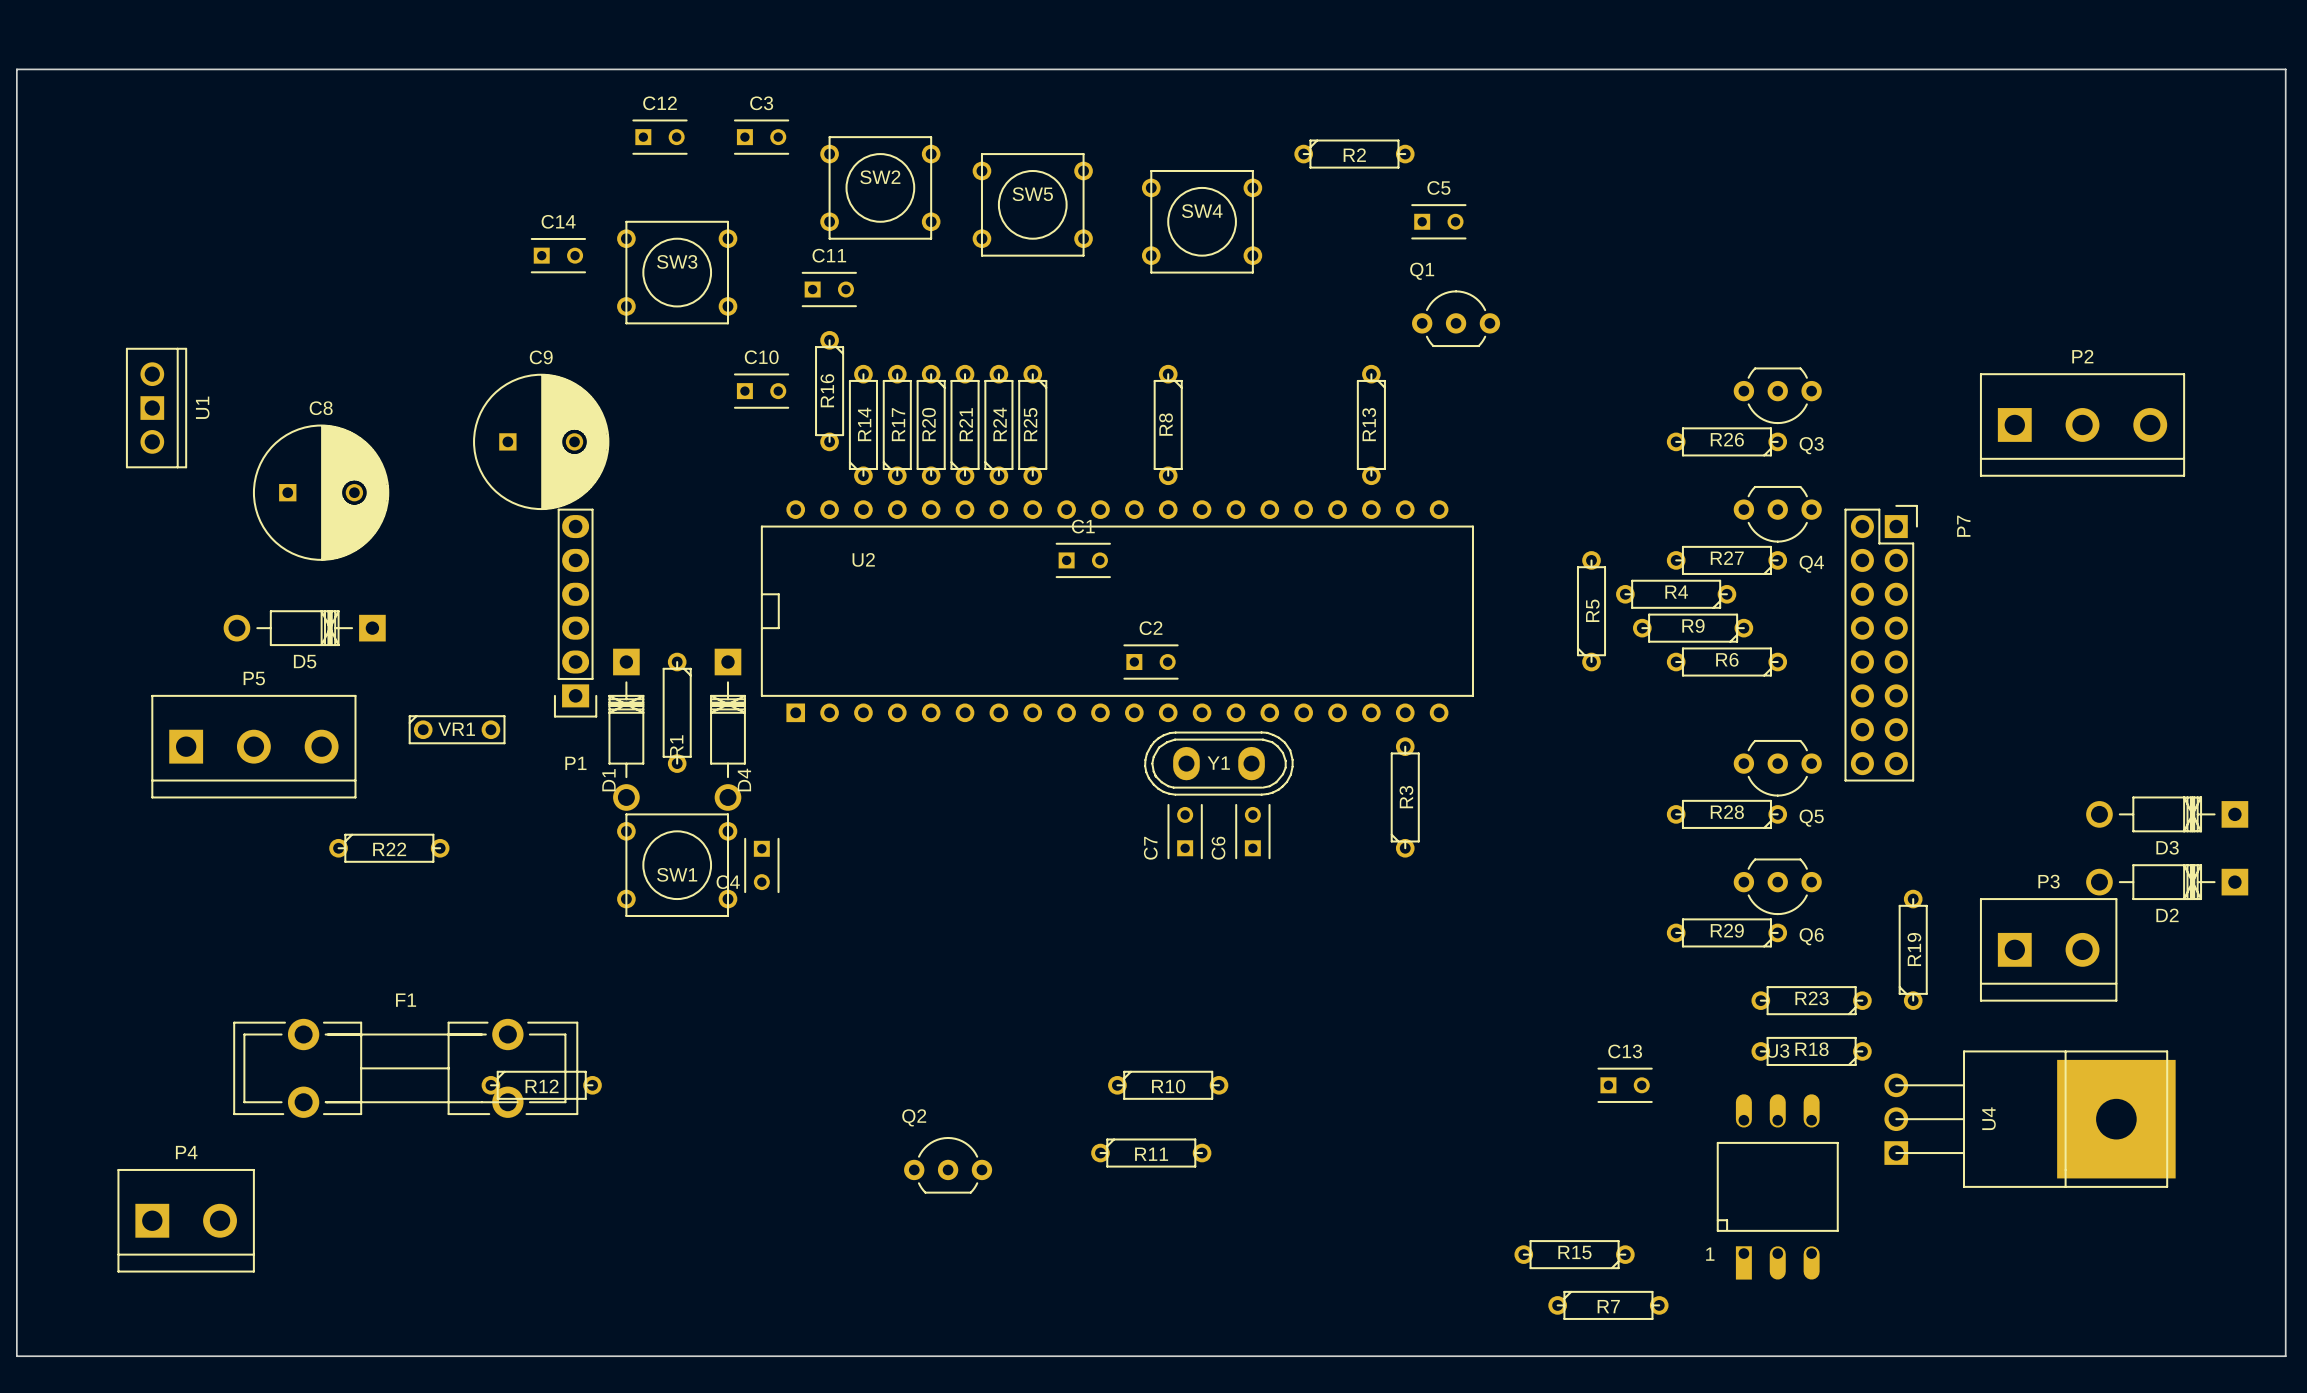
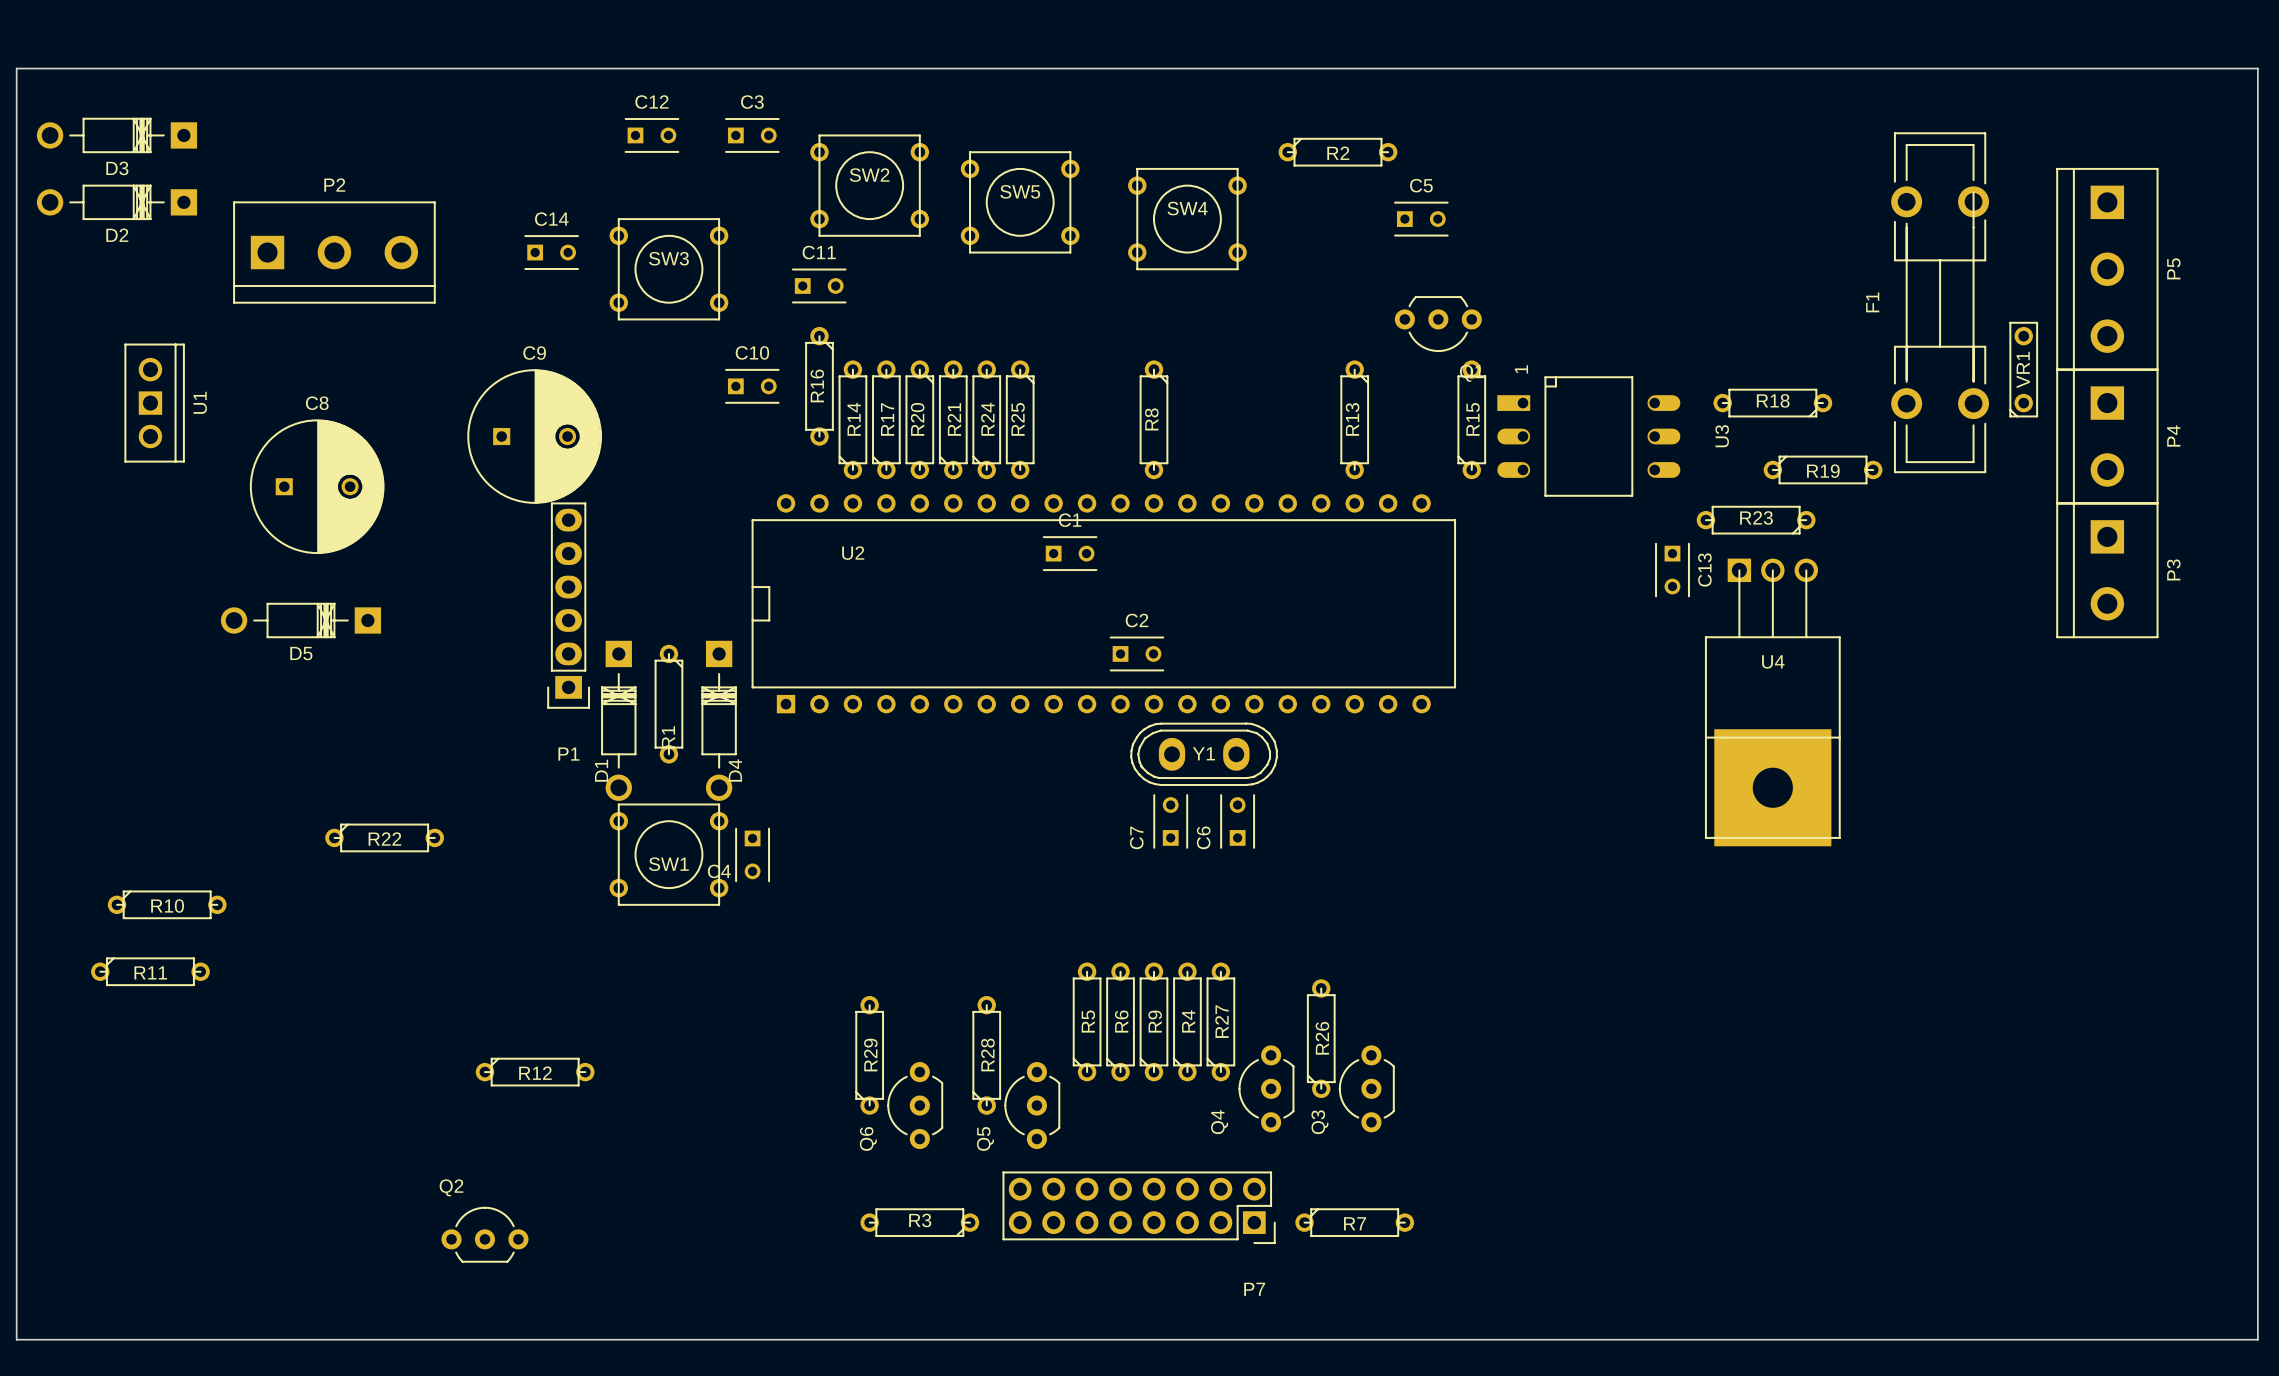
Q1 rotation: 0° (1456, 318) -> 180° (1438, 324)
Q3 rotation: 0° (1777, 395) -> 90° clockwise (1366, 1088)
Q3 position: (1777, 395) -> (1366, 1088)
P2 position: (2082, 424) -> (334, 252)
R26 rotation: 0° (1726, 441) -> 90° clockwise (1321, 1038)
R26 position: (1726, 441) -> (1321, 1038)
Q4 rotation: 0° (1777, 514) -> 90° clockwise (1266, 1088)
Q4 position: (1777, 514) -> (1266, 1088)
R27 rotation: 0° (1726, 560) -> 90° clockwise (1220, 1021)
R27 position: (1726, 560) -> (1220, 1021)
R4 rotation: 0° (1676, 594) -> 90° clockwise (1187, 1021)
R4 position: (1676, 594) -> (1187, 1021)
R5 position: (1591, 611) -> (1087, 1021)
R9 rotation: 0° (1693, 628) -> 90° clockwise (1153, 1021)
R9 position: (1693, 628) -> (1153, 1021)
P7 rotation: 0° (1881, 643) -> 90° clockwise (1139, 1207)
P7 position: (1881, 643) -> (1139, 1207)
R6 rotation: 0° (1726, 662) -> 90° clockwise (1120, 1021)
R6 position: (1726, 662) -> (1120, 1021)
VR1 rotation: 0° (457, 729) -> 90° counterclockwise (2023, 369)
VR1 position: (457, 729) -> (2023, 369)
P5 rotation: 0° (253, 746) -> 90° clockwise (2107, 269)
P5 position: (253, 746) -> (2107, 269)
Q5 rotation: 0° (1777, 768) -> 90° clockwise (1032, 1105)
Q5 position: (1777, 768) -> (1032, 1105)
R3 rotation: 0° (1405, 797) -> 90° counterclockwise (919, 1222)
R3 position: (1405, 797) -> (919, 1222)
R28 rotation: 0° (1726, 814) -> 90° clockwise (986, 1055)
R28 position: (1726, 814) -> (986, 1055)
D3 position: (2167, 814) -> (117, 135)
D2 position: (2167, 882) -> (117, 202)
Q6 rotation: 0° (1777, 886) -> 90° clockwise (915, 1105)
Q6 position: (1777, 886) -> (915, 1105)
R29 rotation: 0° (1726, 932) -> 90° clockwise (869, 1055)
R29 position: (1726, 932) -> (869, 1055)
R19 rotation: 0° (1913, 949) -> 90° clockwise (1823, 469)
R19 position: (1913, 949) -> (1823, 469)
P3 rotation: 0° (2048, 949) -> 90° clockwise (2107, 570)
P3 position: (2048, 949) -> (2107, 570)
R23 position: (1811, 1000) -> (1756, 520)
R18 position: (1811, 1051) -> (1772, 403)
F1 rotation: 0° (405, 1068) -> 90° counterclockwise (1940, 302)
F1 position: (405, 1068) -> (1940, 302)
R10 position: (1168, 1085) -> (167, 904)
C13 rotation: 0° (1625, 1085) -> 90° clockwise (1672, 570)
C13 position: (1625, 1085) -> (1672, 570)
U4 rotation: 0° (2030, 1119) -> 90° clockwise (1772, 702)
U4 position: (2030, 1119) -> (1772, 702)
R11 position: (1151, 1153) -> (150, 971)
Q2 position: (948, 1165) -> (484, 1234)
U3 rotation: 0° (1777, 1186) -> 90° clockwise (1588, 436)
U3 position: (1777, 1186) -> (1588, 436)
P4 rotation: 0° (186, 1220) -> 90° clockwise (2107, 436)
P4 position: (186, 1220) -> (2107, 436)
R15 rotation: 0° (1574, 1254) -> 90° clockwise (1471, 419)
R15 position: (1574, 1254) -> (1471, 419)
R7 position: (1608, 1305) -> (1354, 1222)

